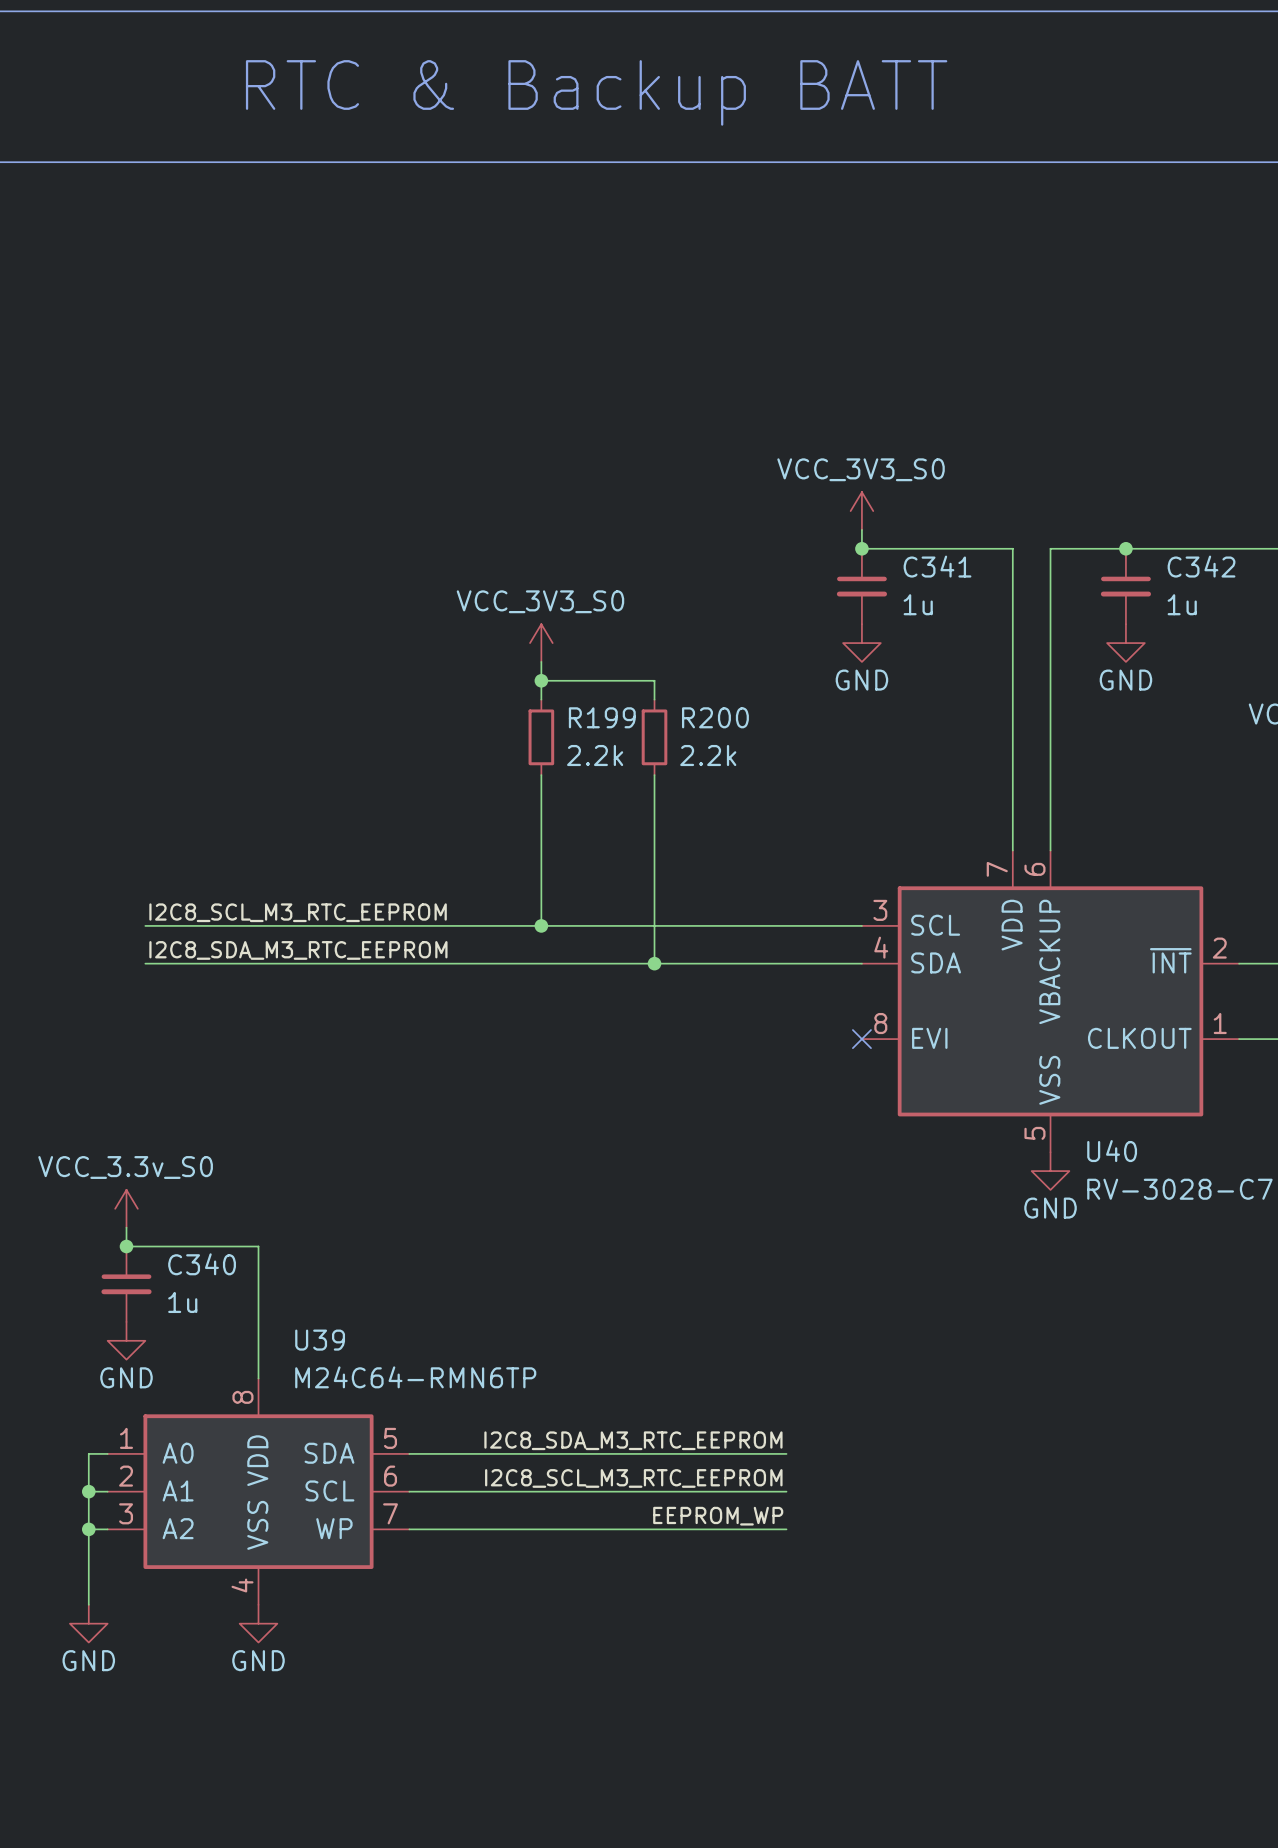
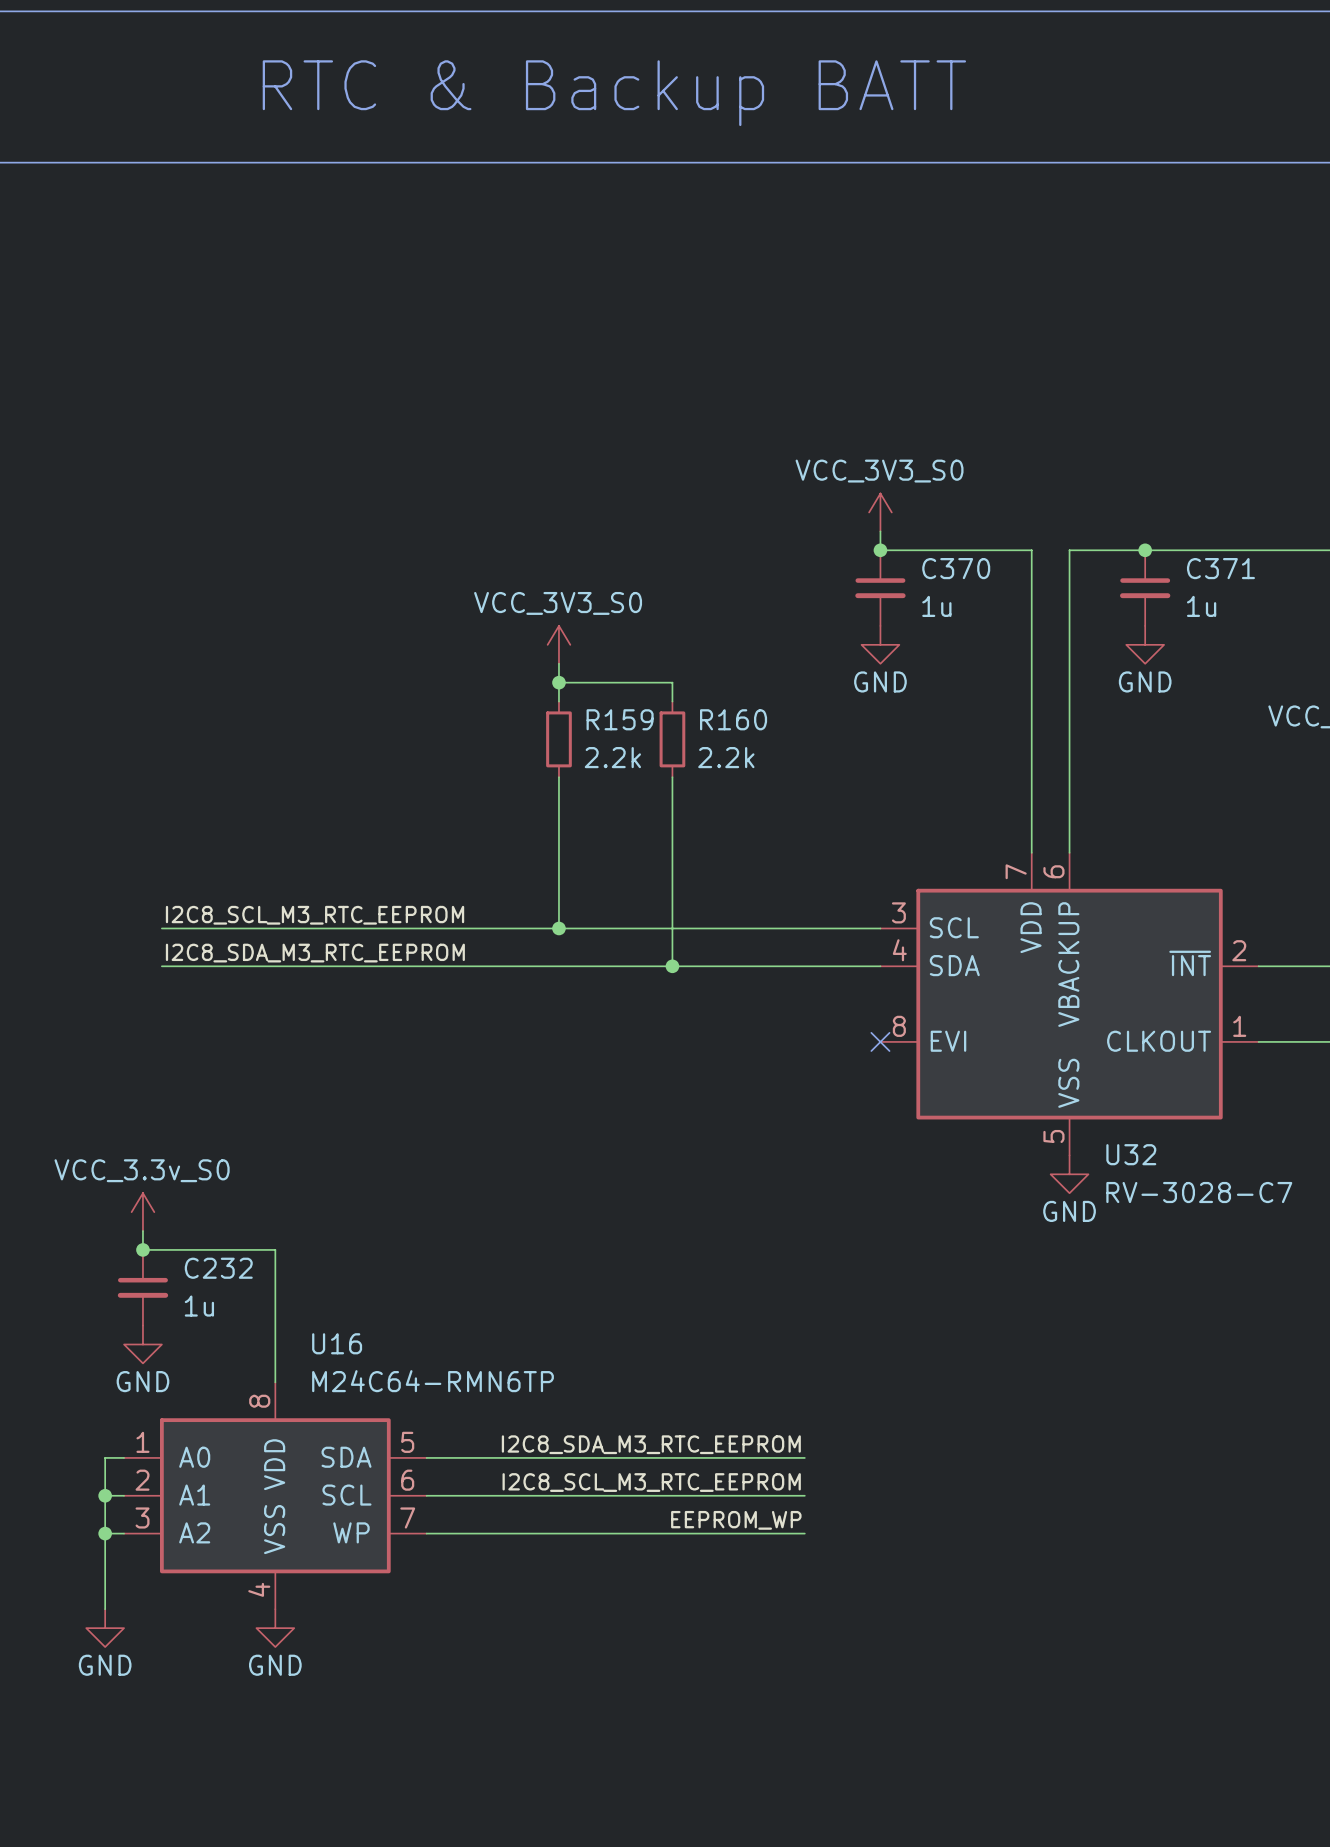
C341 name: C341 (937, 566) -> C370 (956, 568)
C342 name: C342 (1201, 566) -> C371 (1220, 568)
R199 name: R199 (602, 717) -> R159 (620, 719)
R200 name: R200 (715, 717) -> R160 (733, 719)
U40 name: U40 (1112, 1151) -> U32 (1131, 1154)
C340 name: C340 (202, 1264) -> C232 (218, 1268)
U39 name: U39 (320, 1340) -> U16 (337, 1343)

